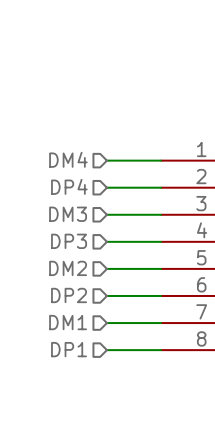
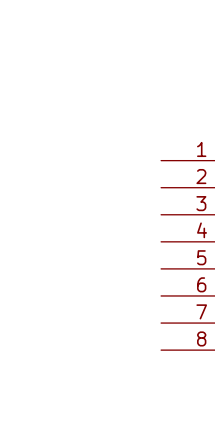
hierarchical label: DM4 (68, 159) -> none
wire: (106, 160) (161, 160) -> none
hierarchical label: DP4 (69, 186) -> none
wire: (106, 187) (161, 187) -> none
hierarchical label: DM3 (68, 214) -> none
wire: (106, 214) (161, 214) -> none
hierarchical label: DP3 (69, 241) -> none
wire: (106, 241) (161, 241) -> none
hierarchical label: DM2 (68, 268) -> none
wire: (106, 268) (161, 268) -> none
hierarchical label: DP2 (69, 295) -> none
wire: (106, 295) (161, 295) -> none
hierarchical label: DM1 (68, 322) -> none
wire: (106, 323) (161, 323) -> none
hierarchical label: DP1 (69, 349) -> none
wire: (106, 350) (161, 350) -> none

